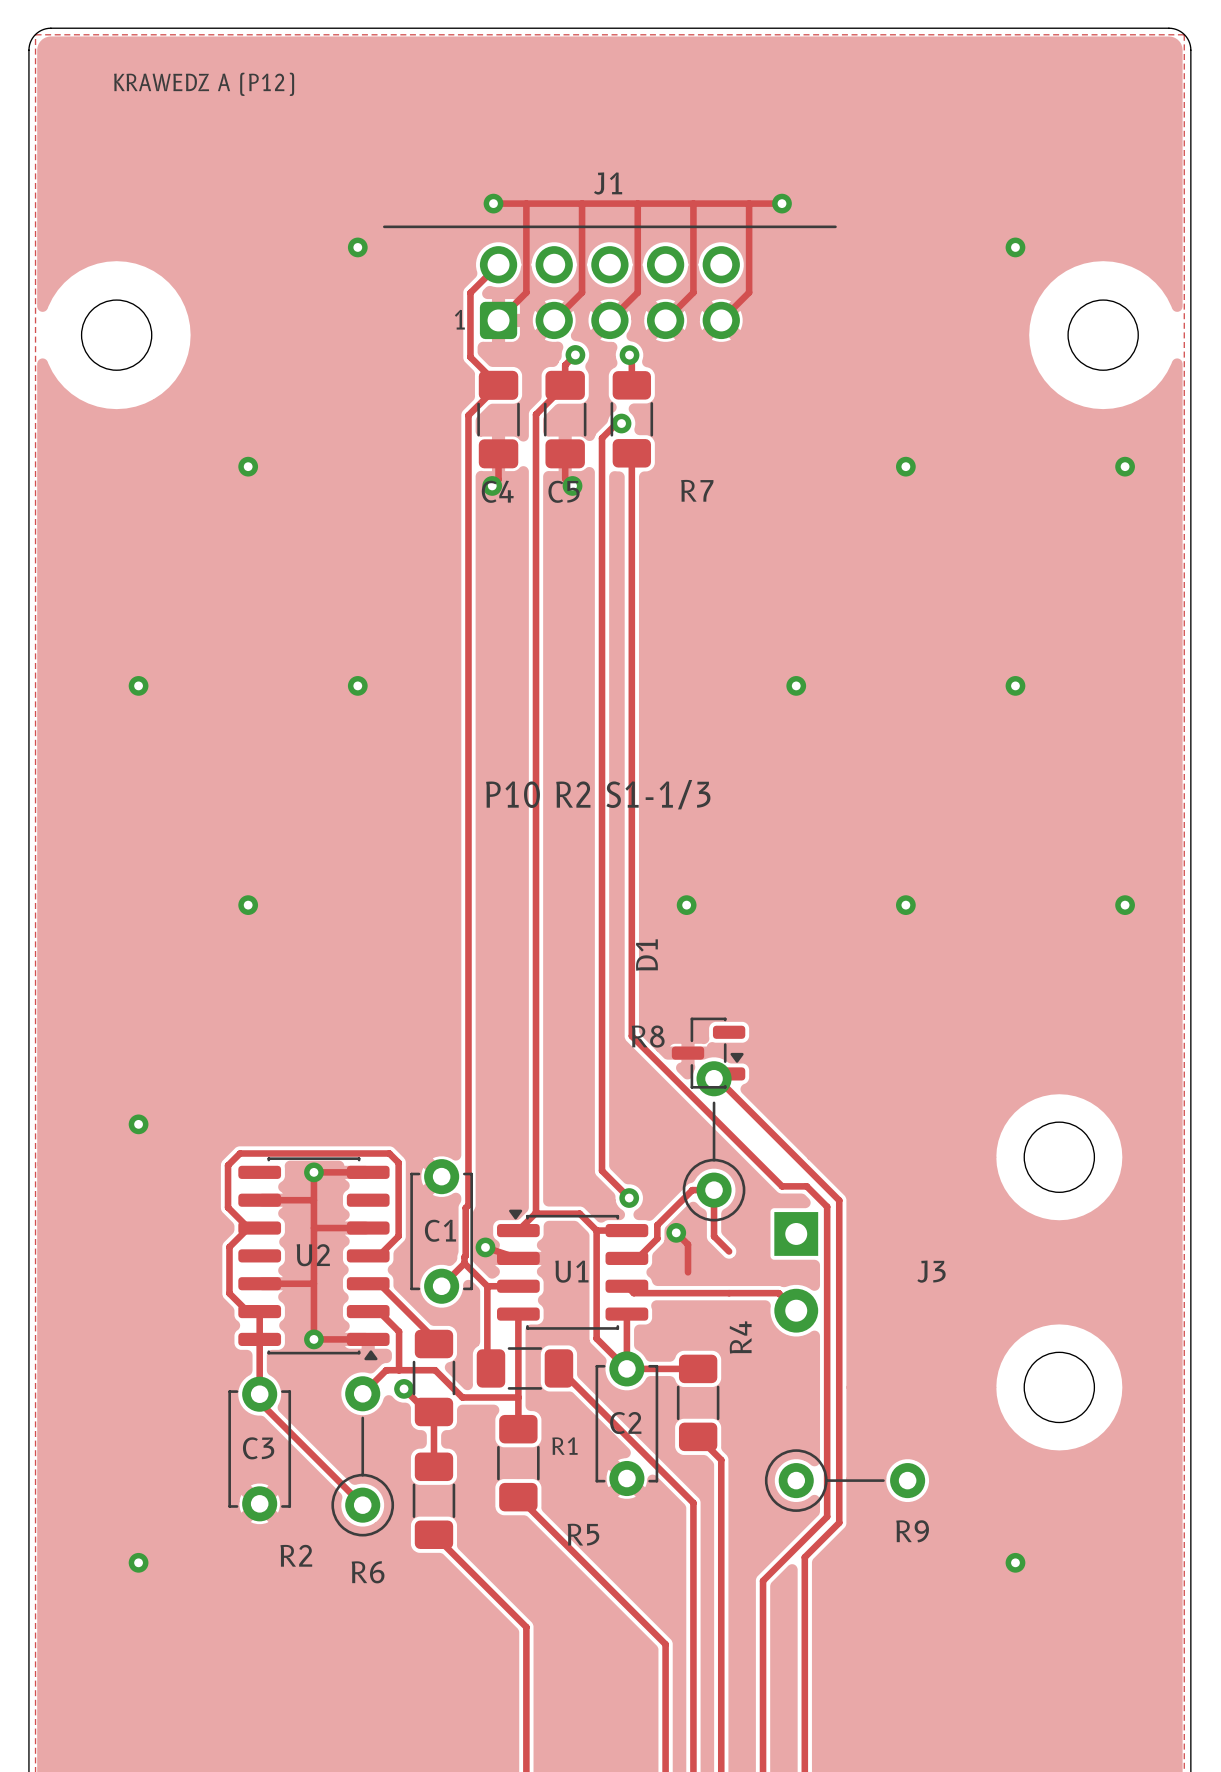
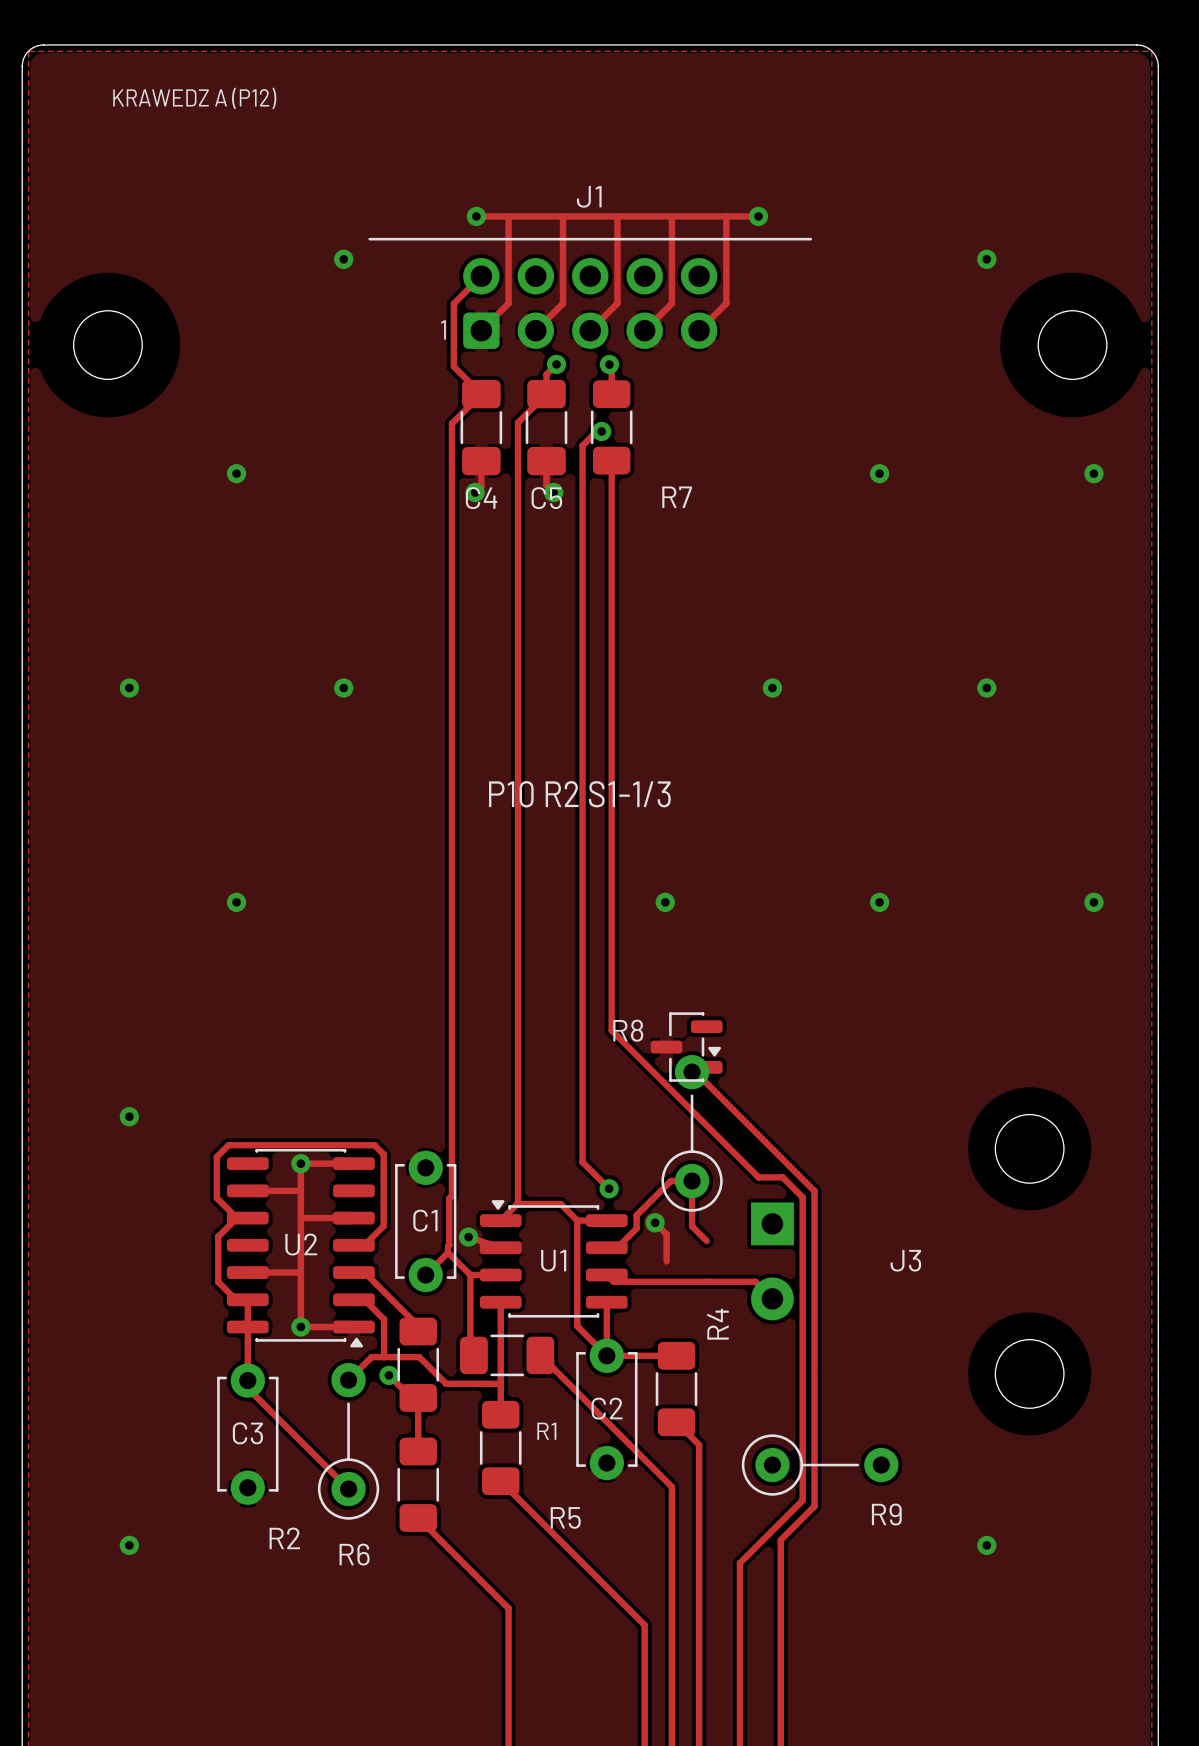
D1 name: D1 (646, 955) -> none

